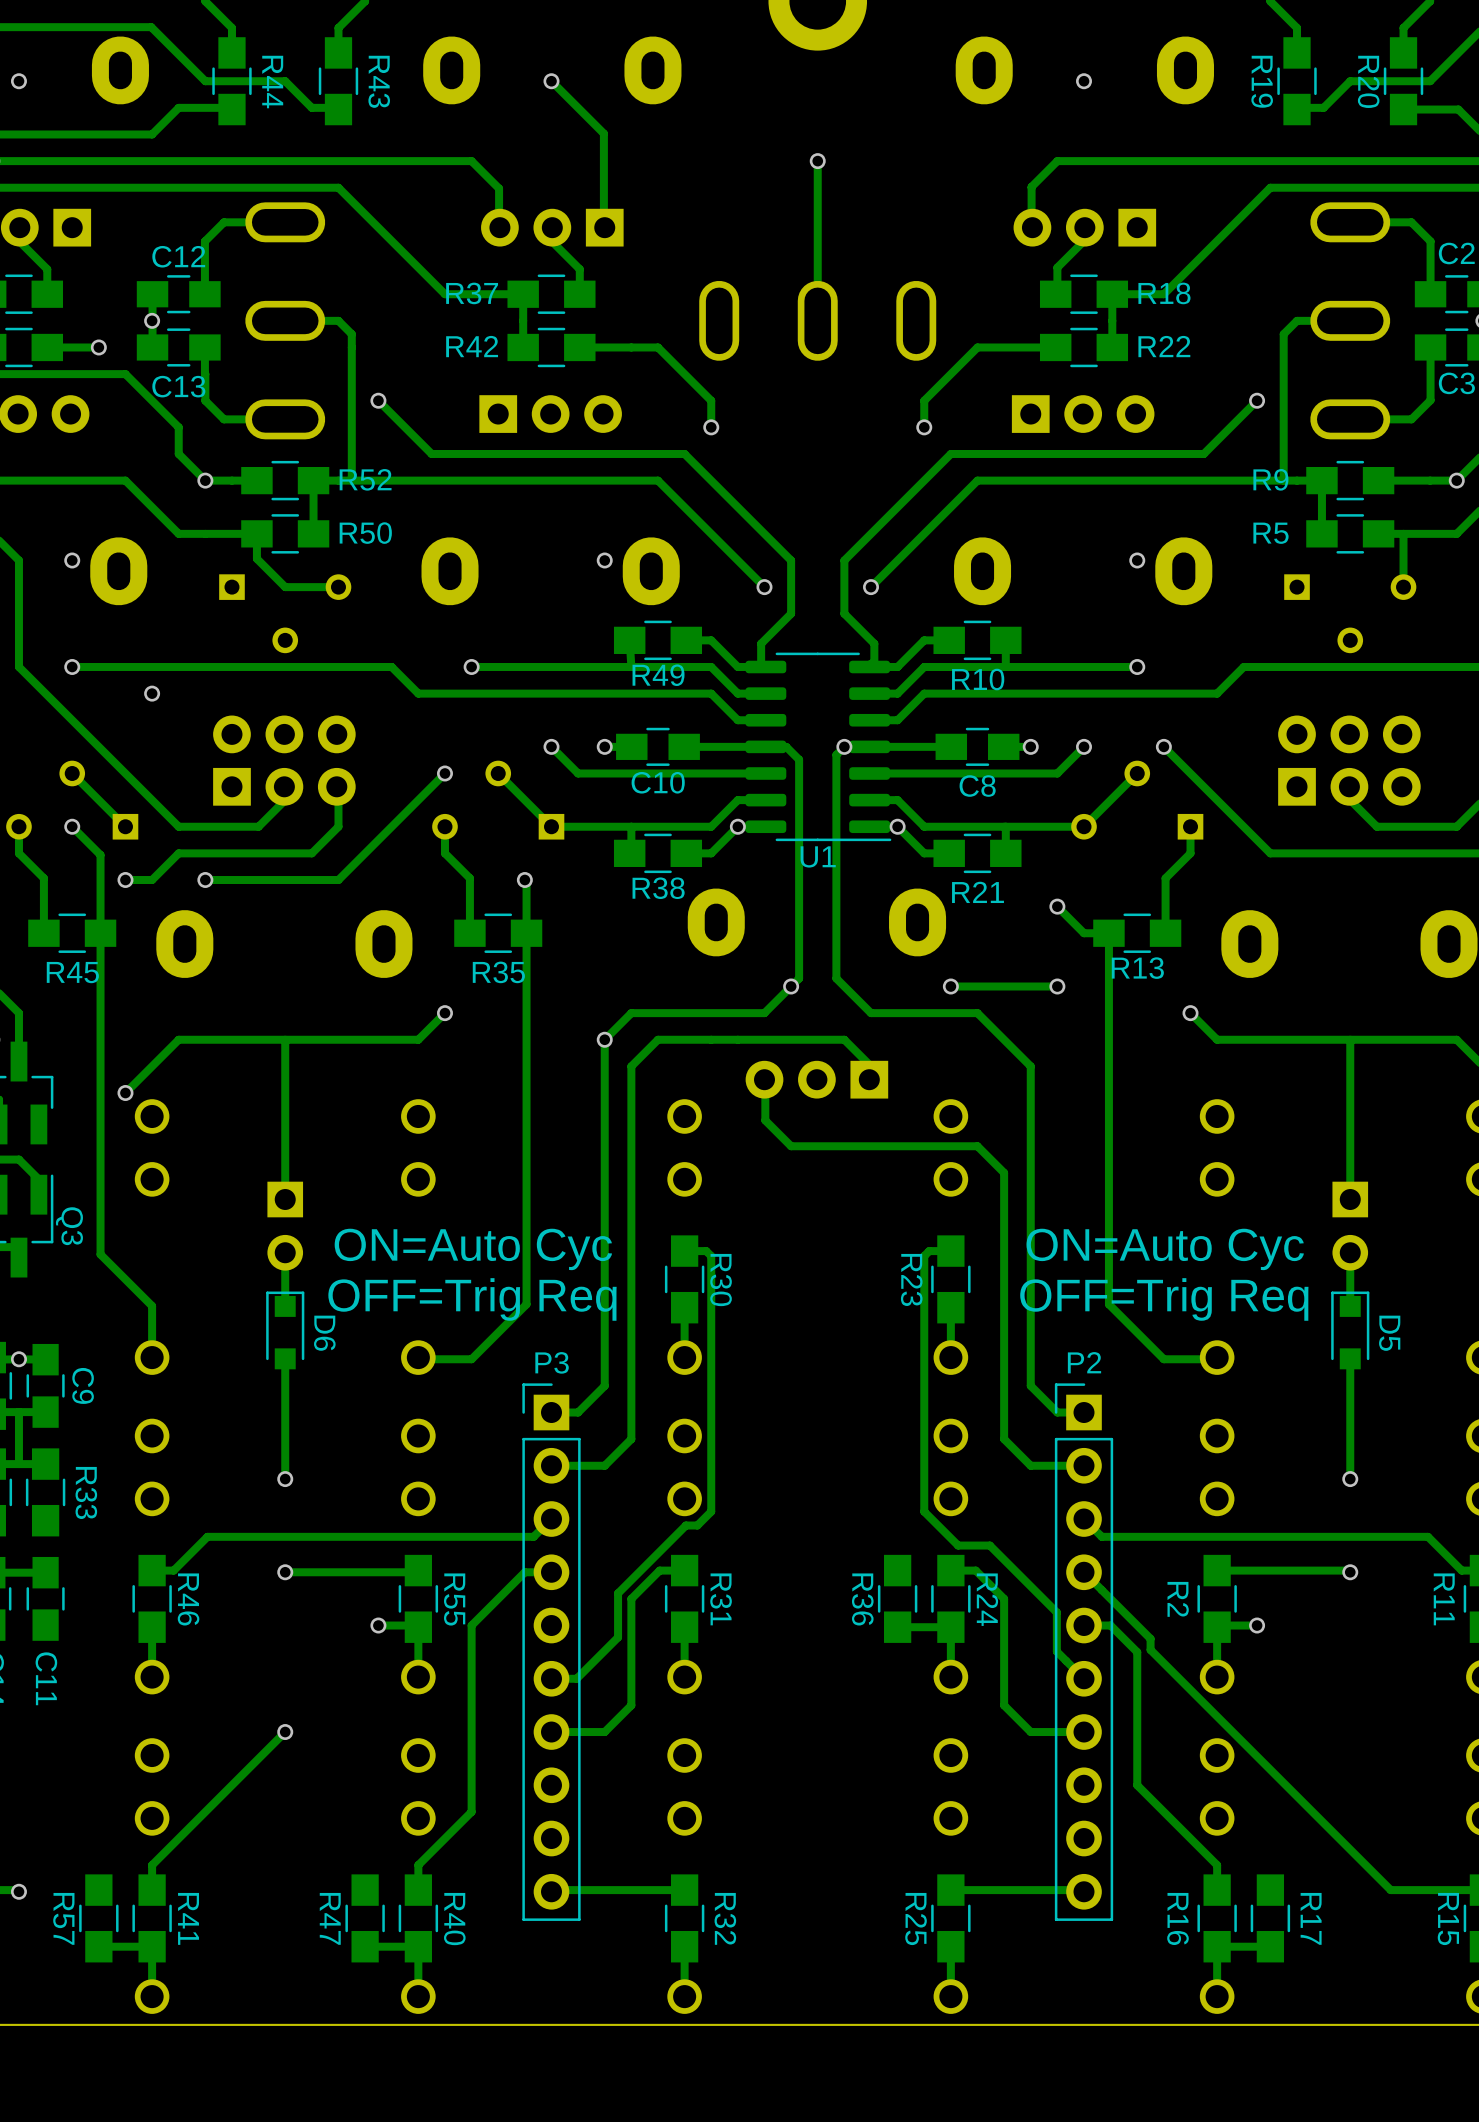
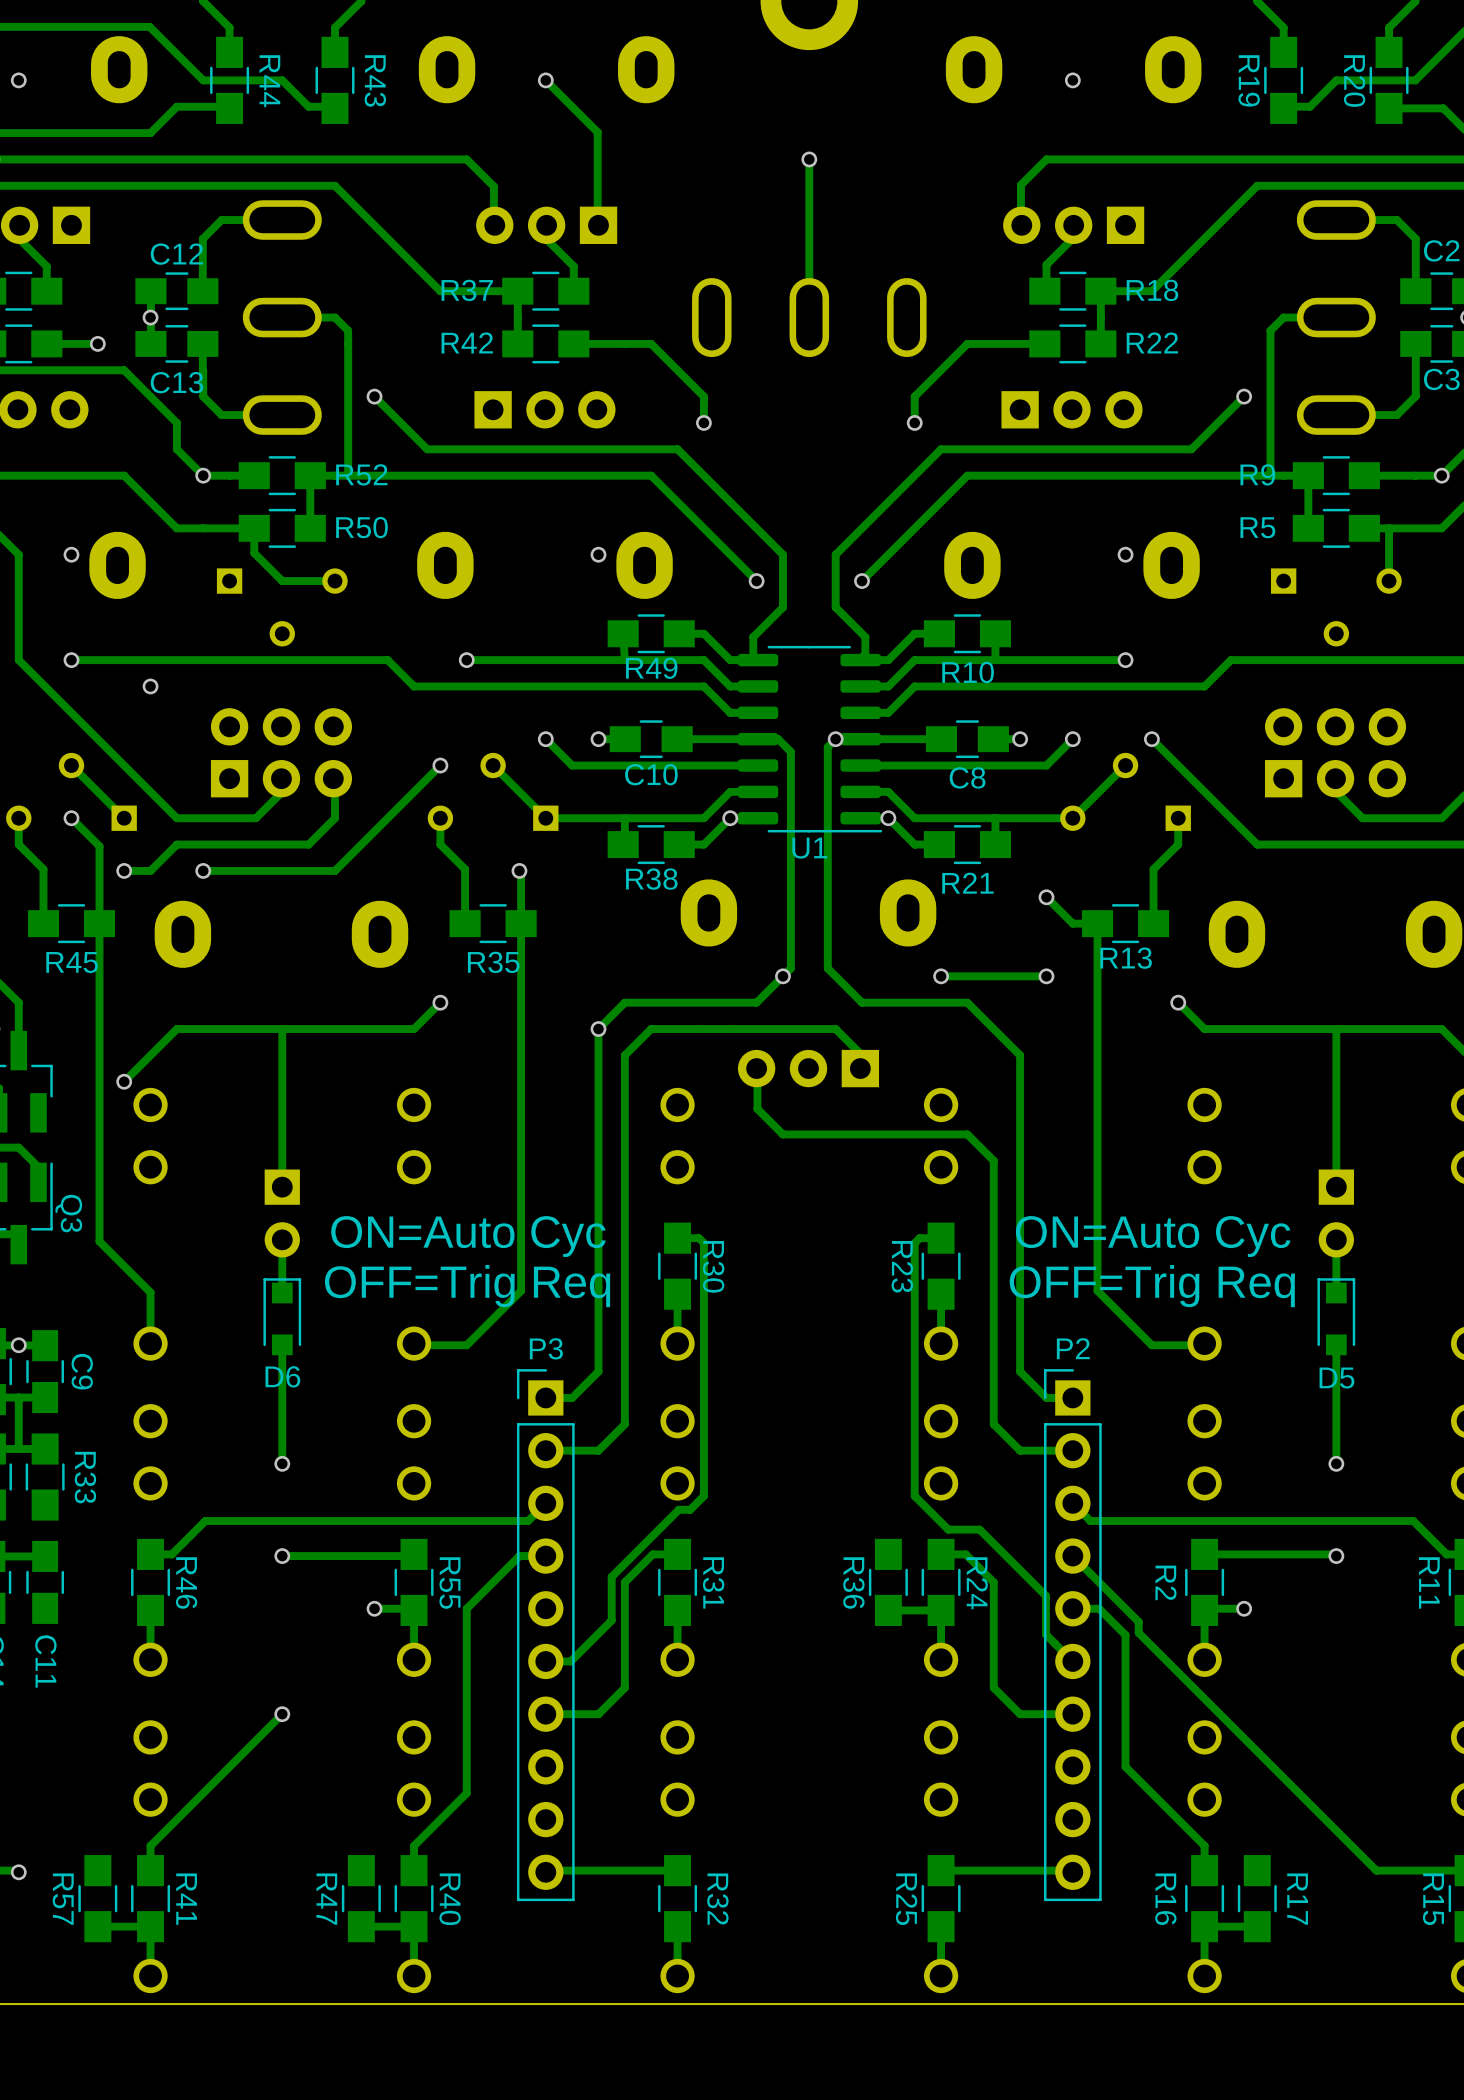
D6 name rotation: 0° (324, 1333) -> 90° counterclockwise (282, 1376)
D6 name position: D6 (324, 1333) -> D6 (282, 1376)
D5 name rotation: 0° (1389, 1333) -> 90° counterclockwise (1336, 1378)
D5 name position: D5 (1389, 1333) -> D5 (1336, 1378)

